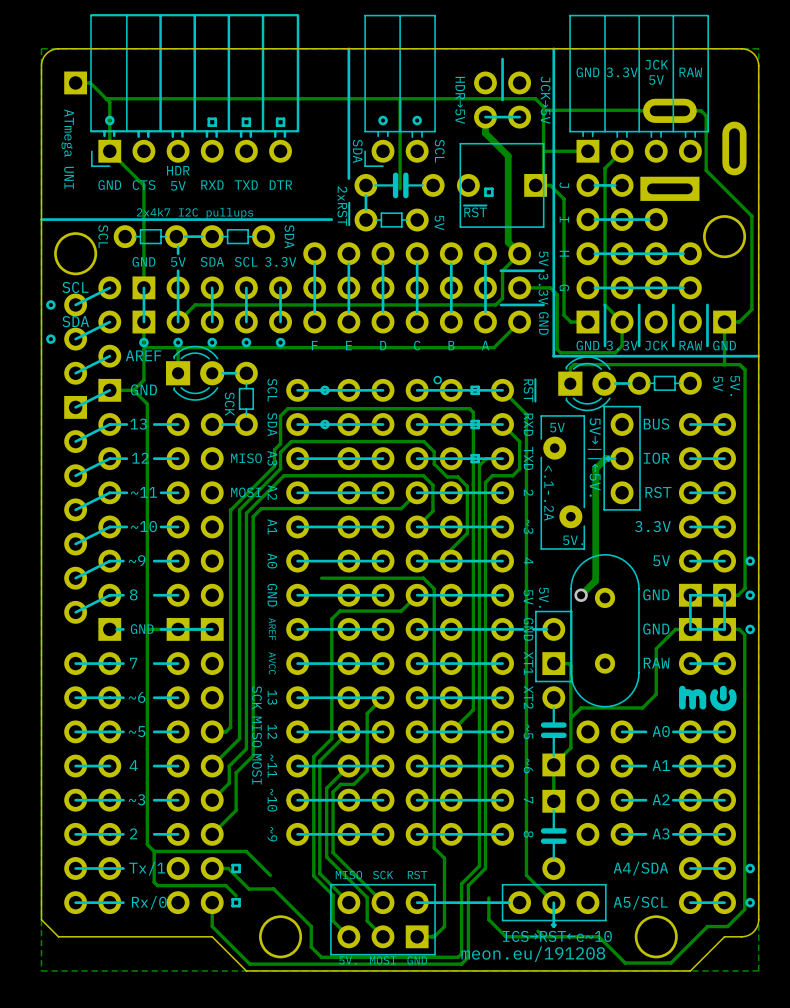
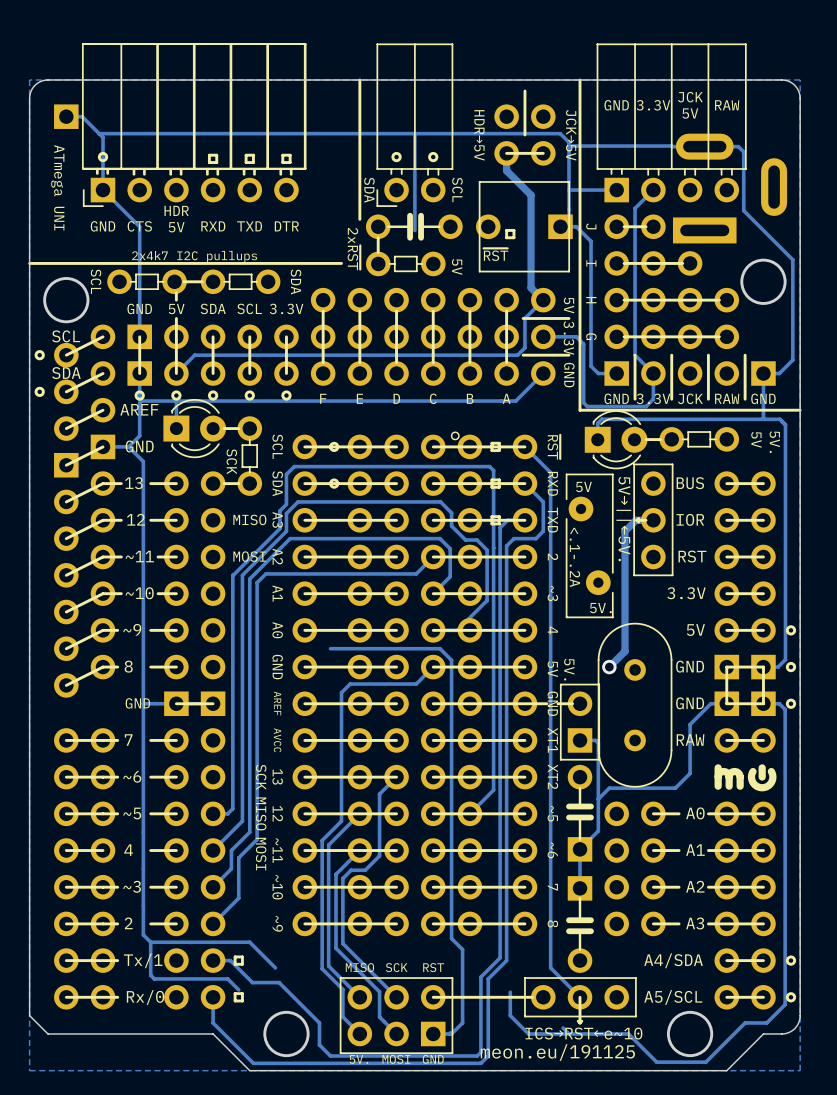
part: (109, 629) -> none
line: (123, 629) (116, 629) -> none
line: (178, 629) (161, 629) -> none
text: meon.eu/191208 (533, 954) -> meon.eu/191125 (557, 1052)

